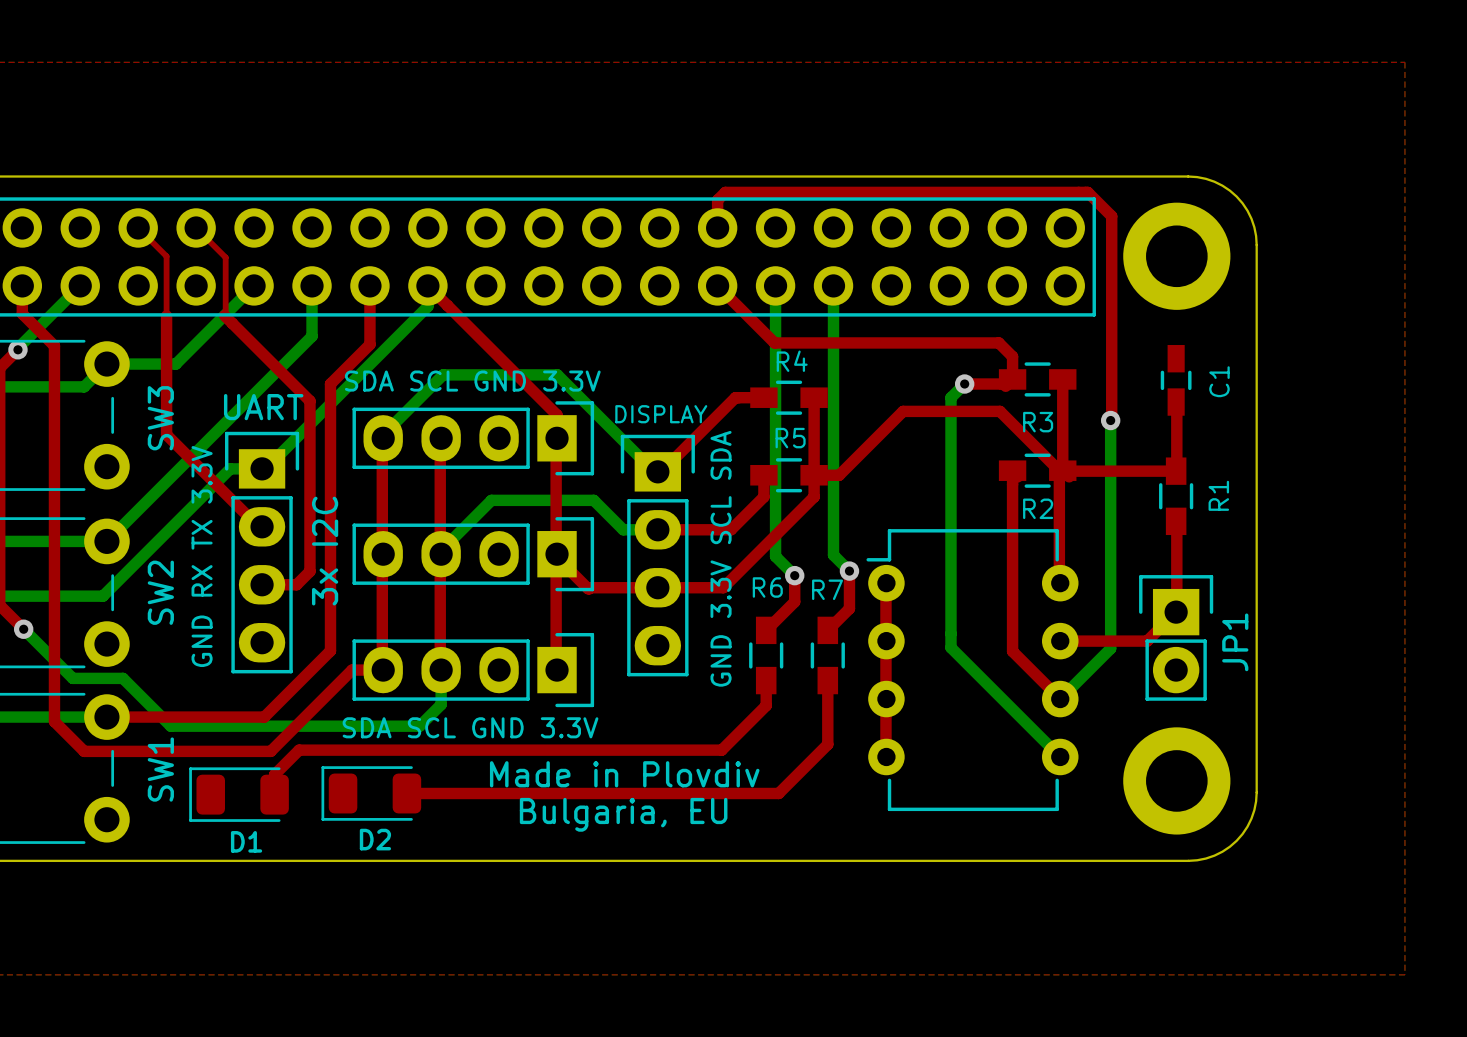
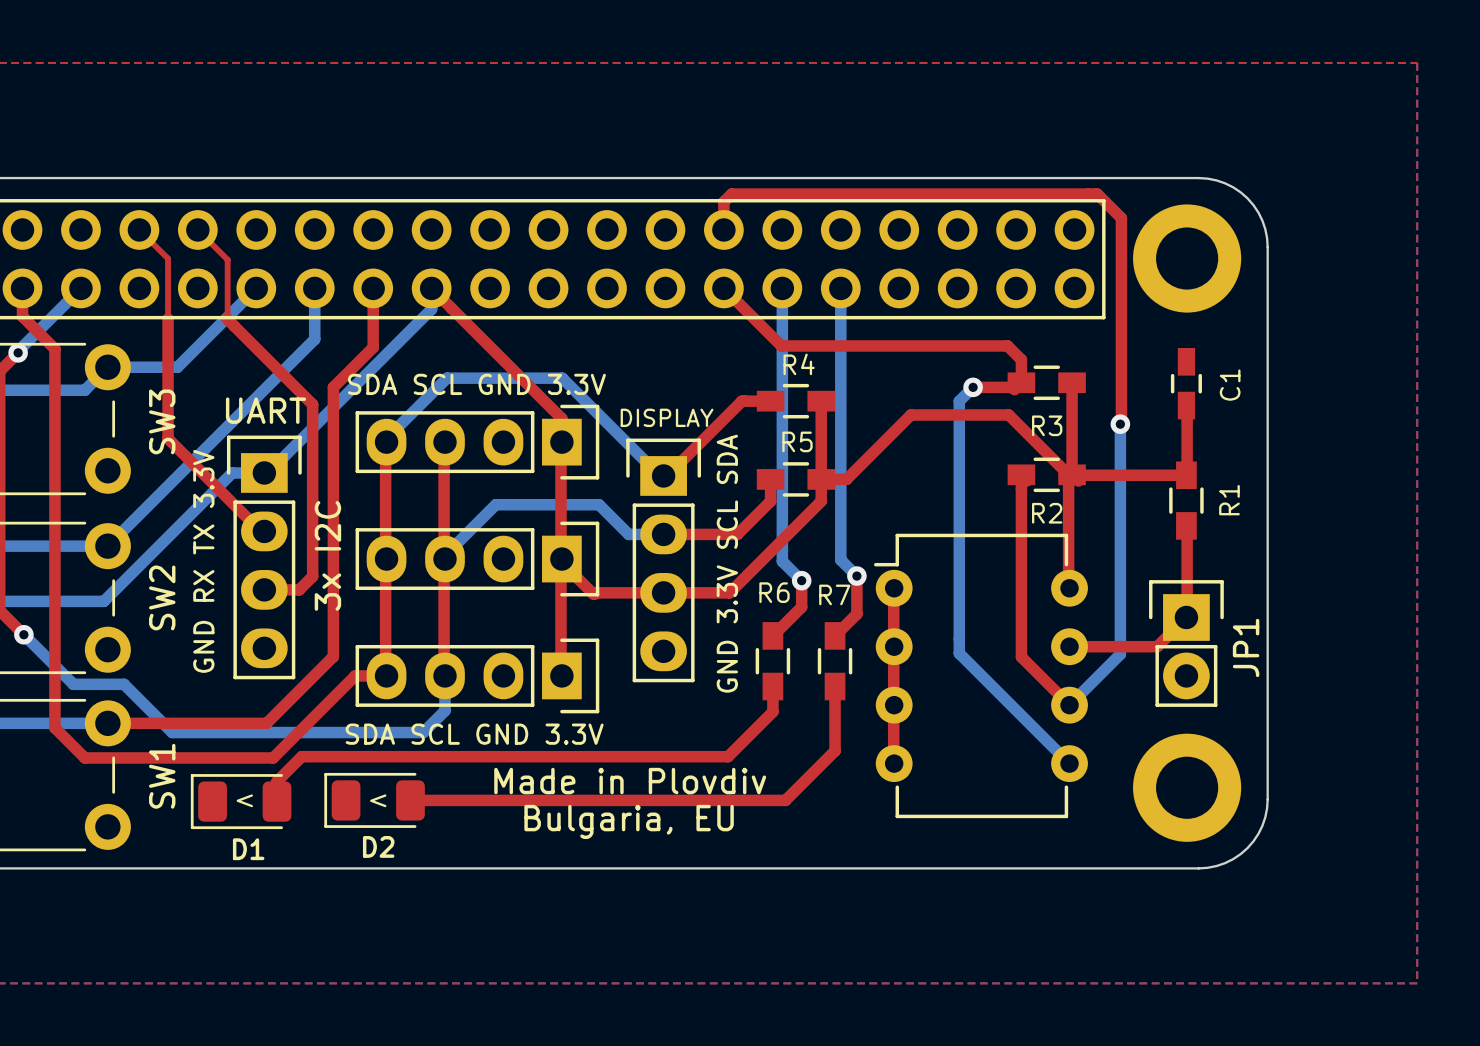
text: none -> < (244, 800)
text: none -> < (378, 800)

